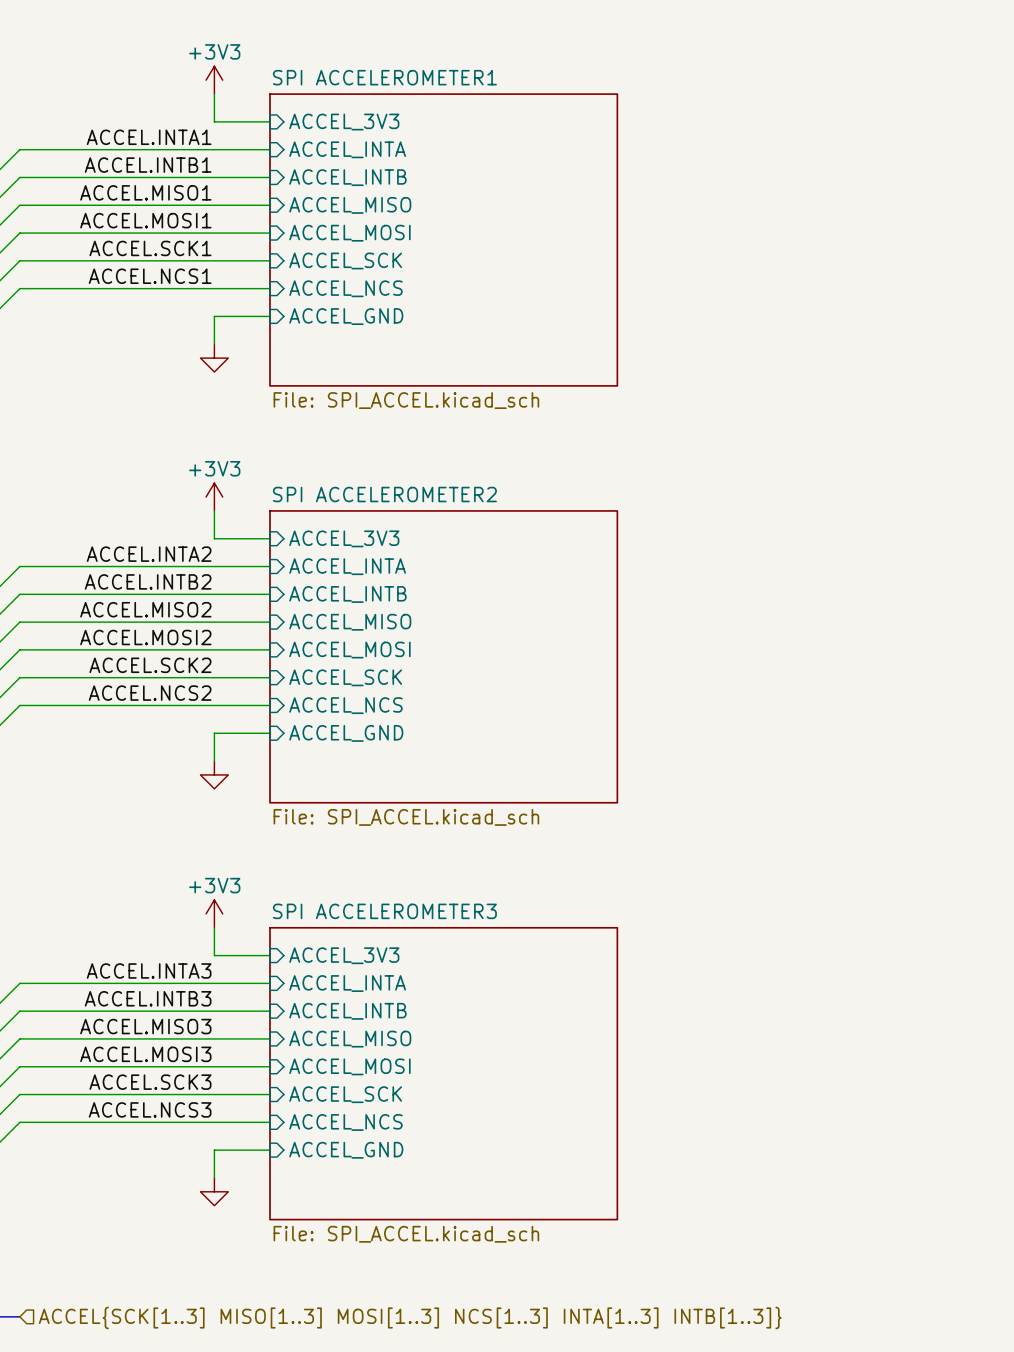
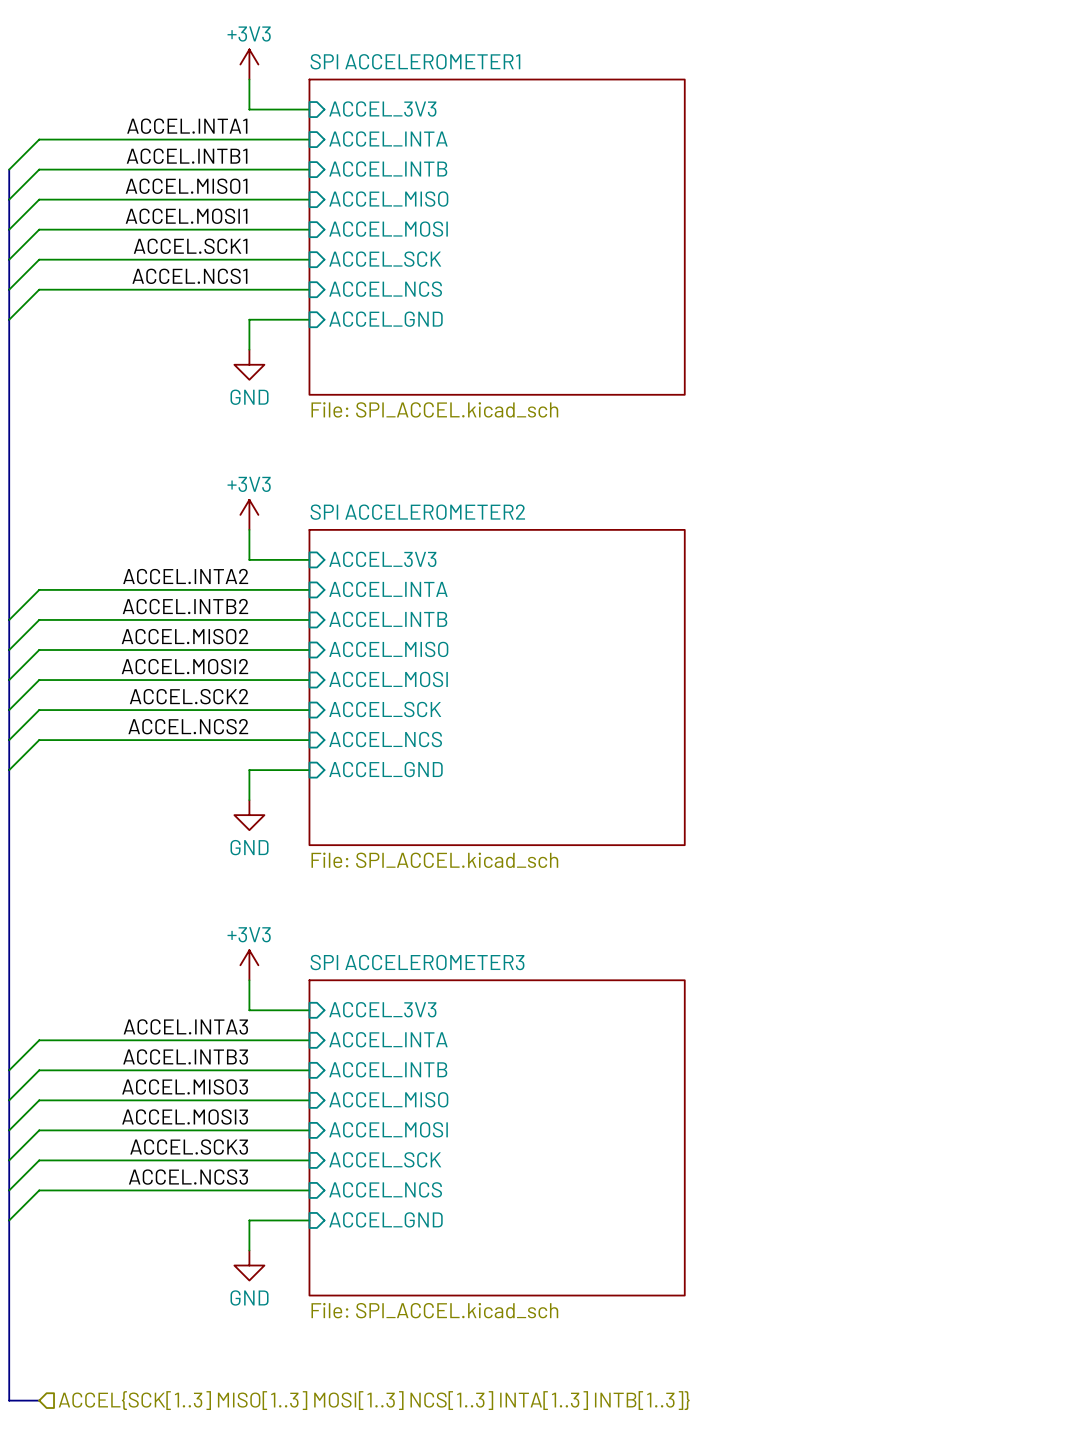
power symbol text: none -> GND (249, 397)
power symbol text: none -> GND (249, 847)
power symbol text: none -> GND (249, 1297)

